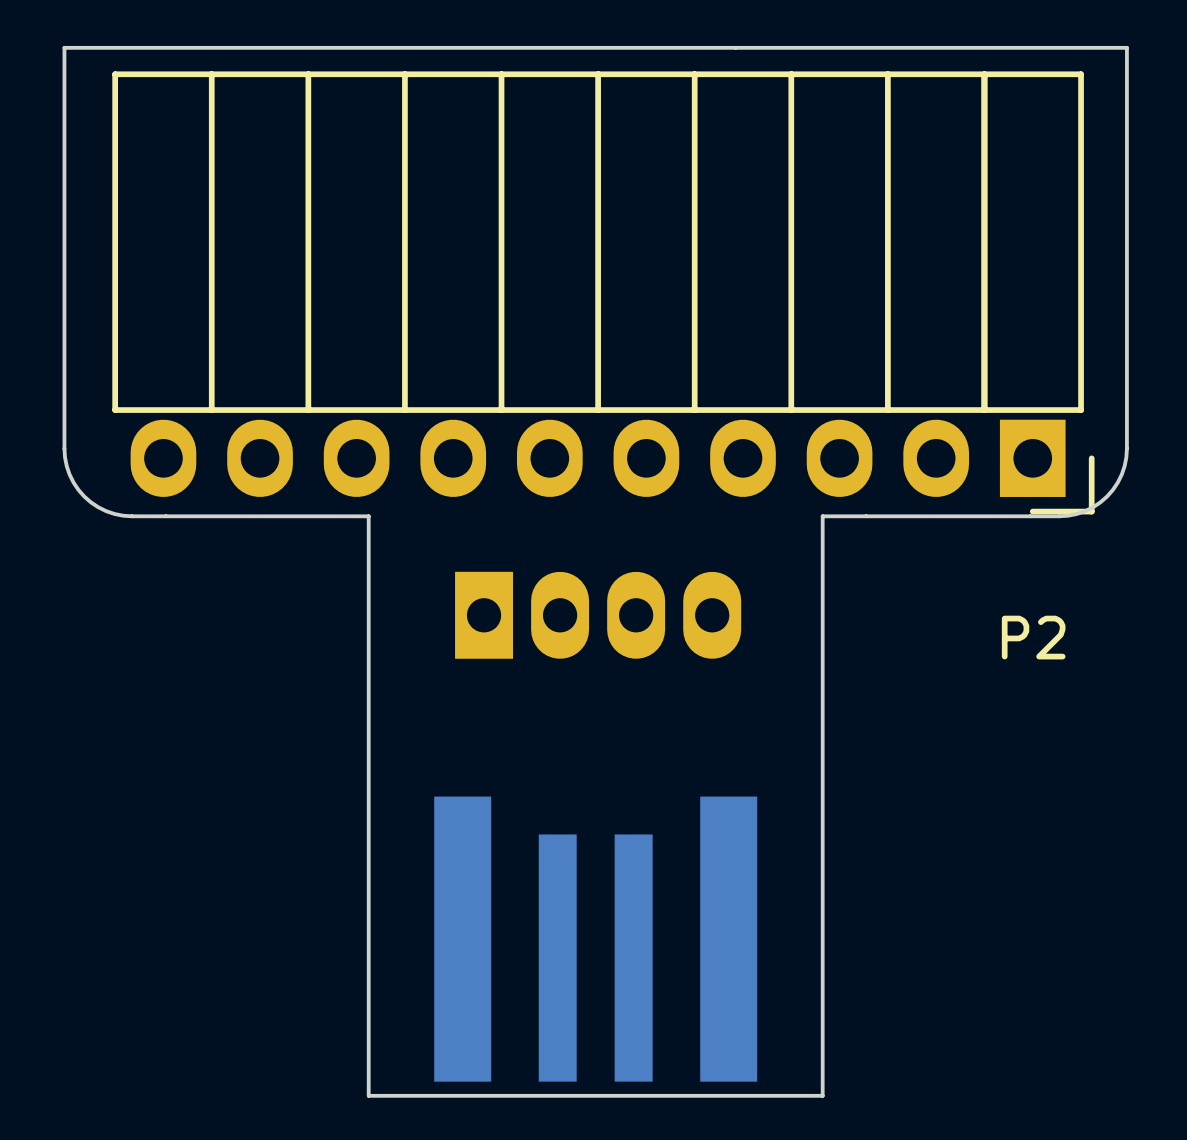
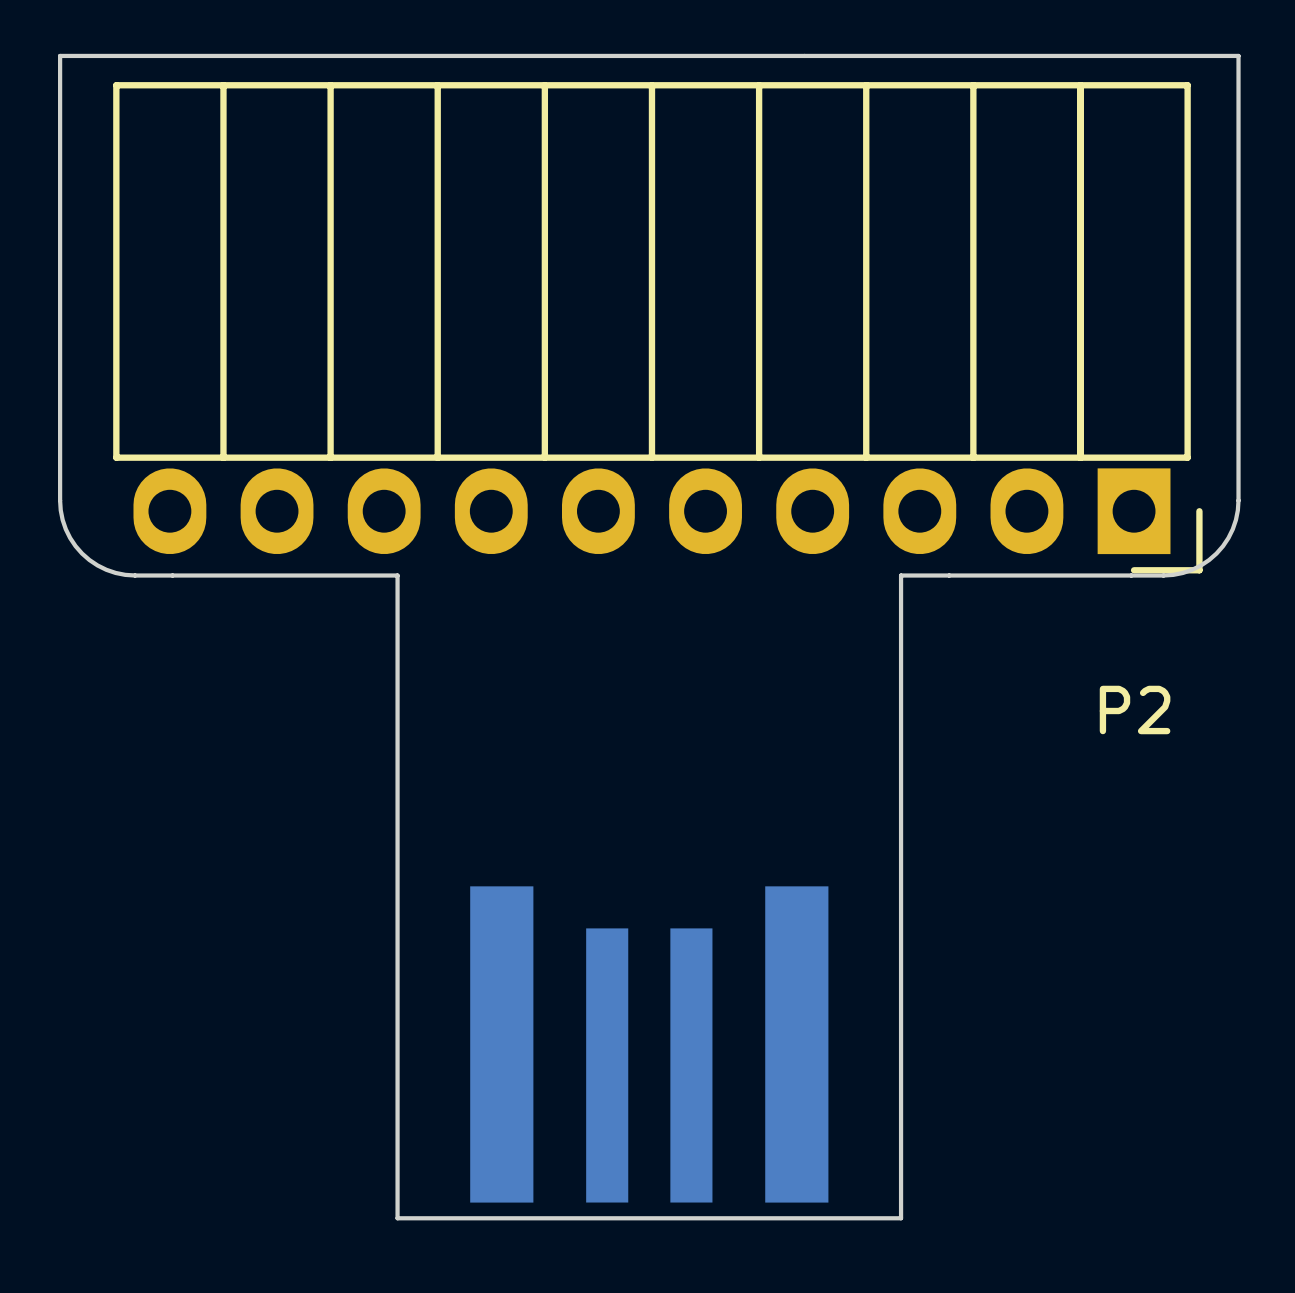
part: (598, 615) -> none

